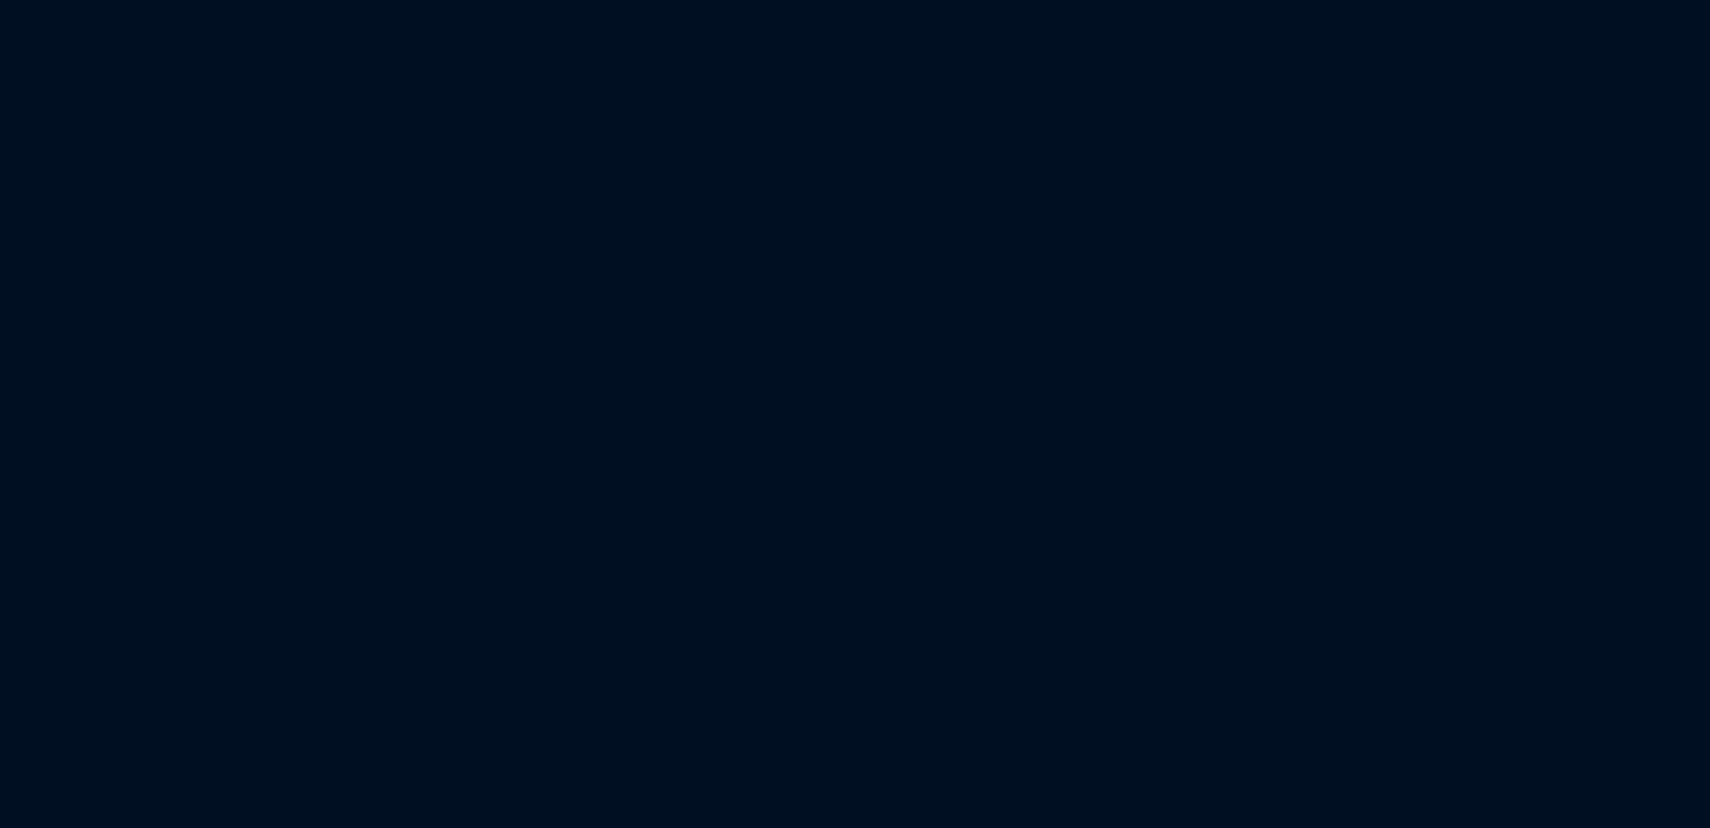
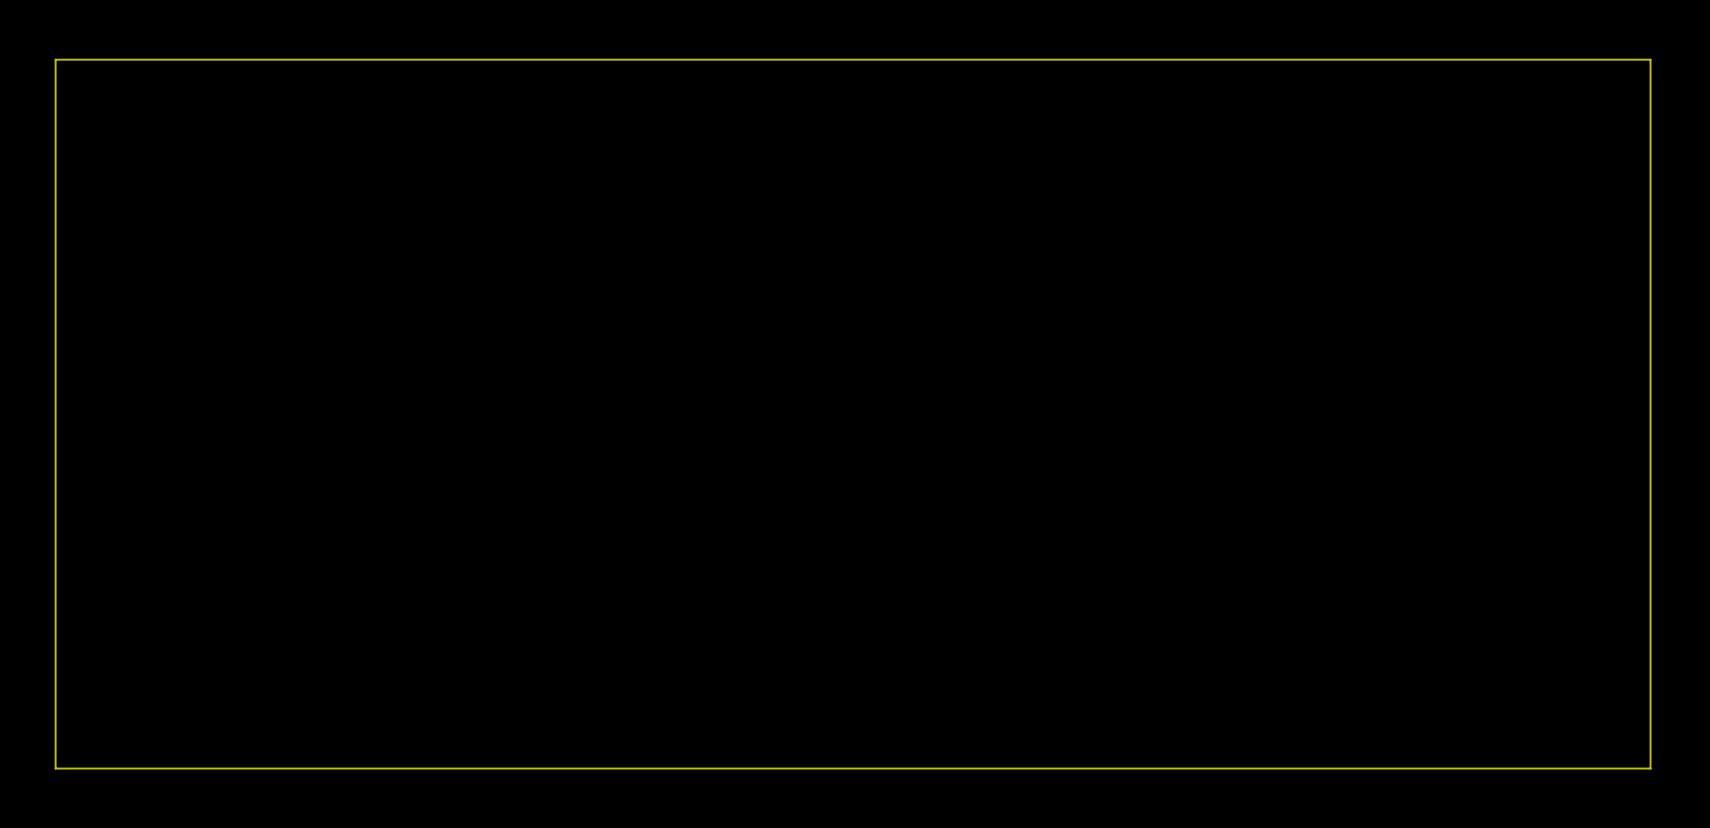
board edge: none -> (1650, 59) (55, 59) (55, 768) (1650, 768) (1650, 59)

